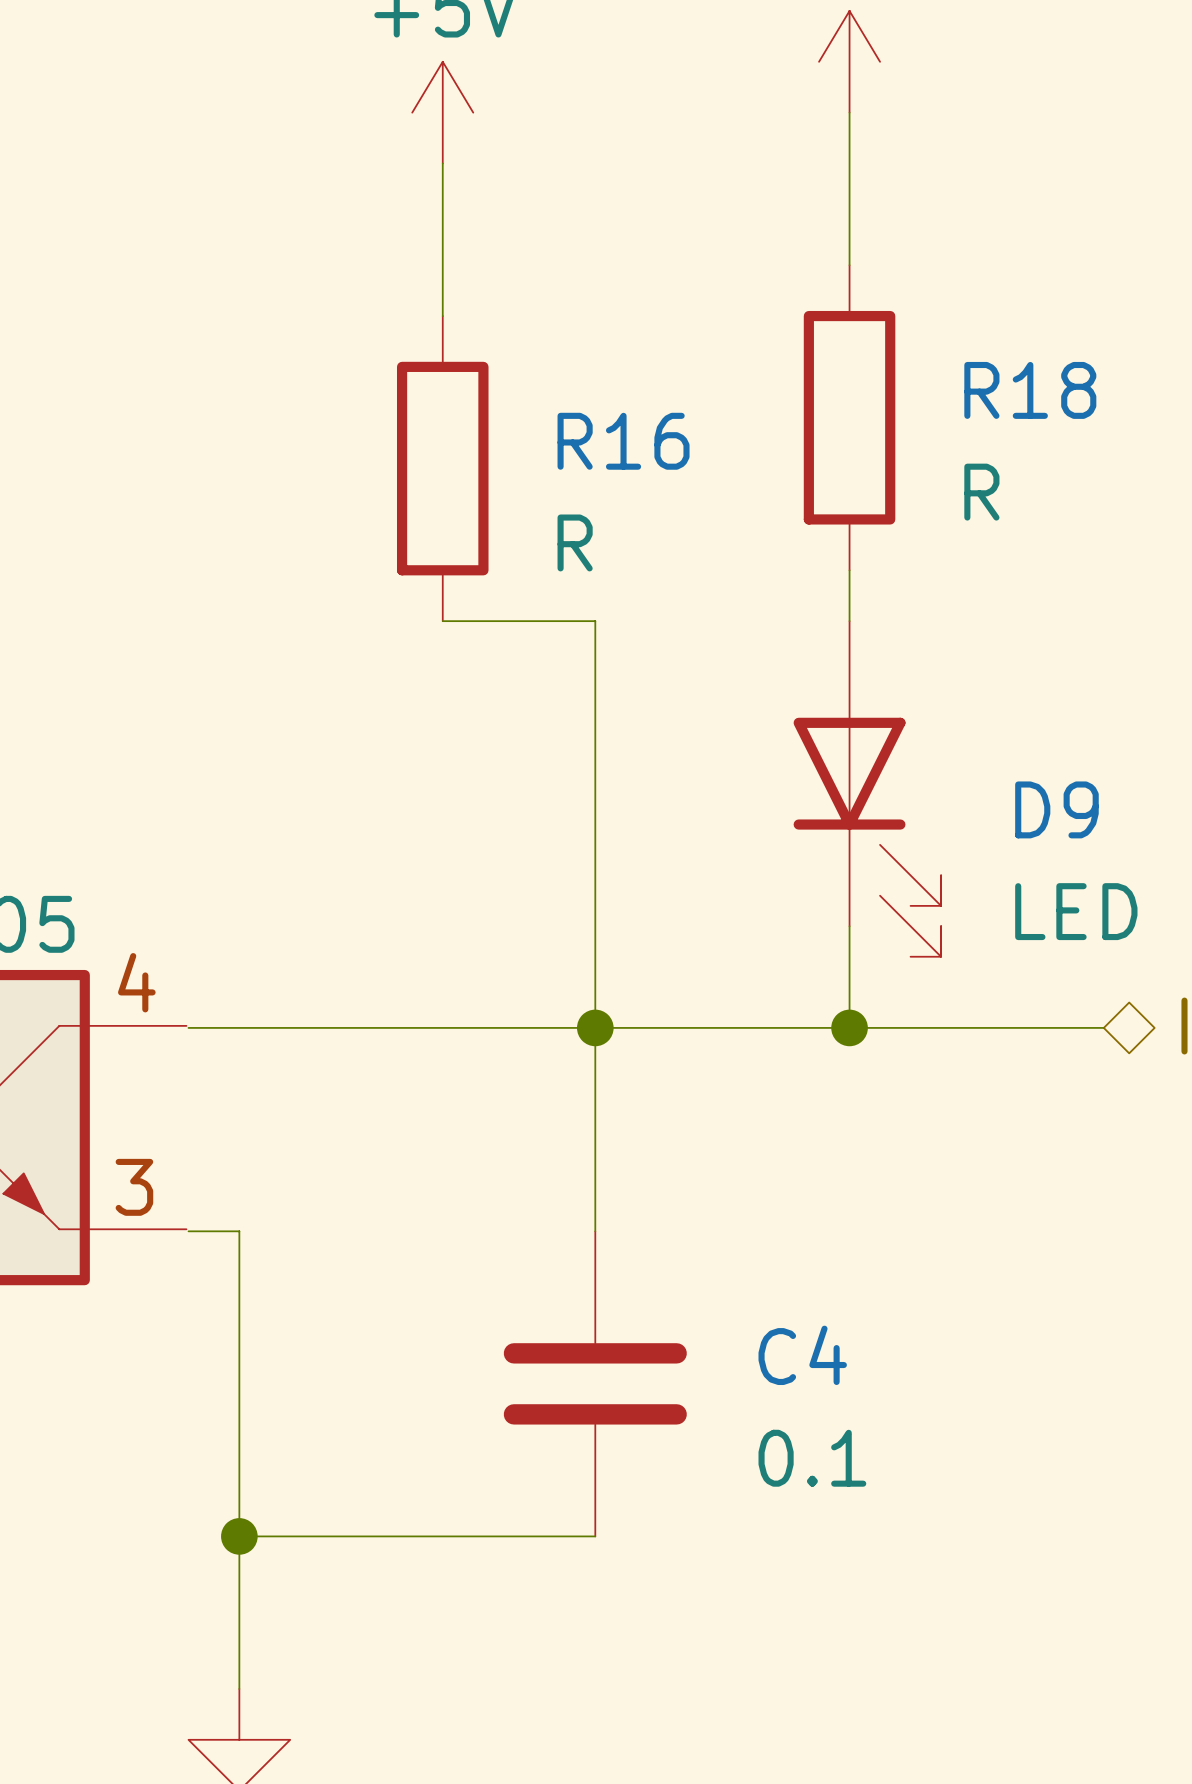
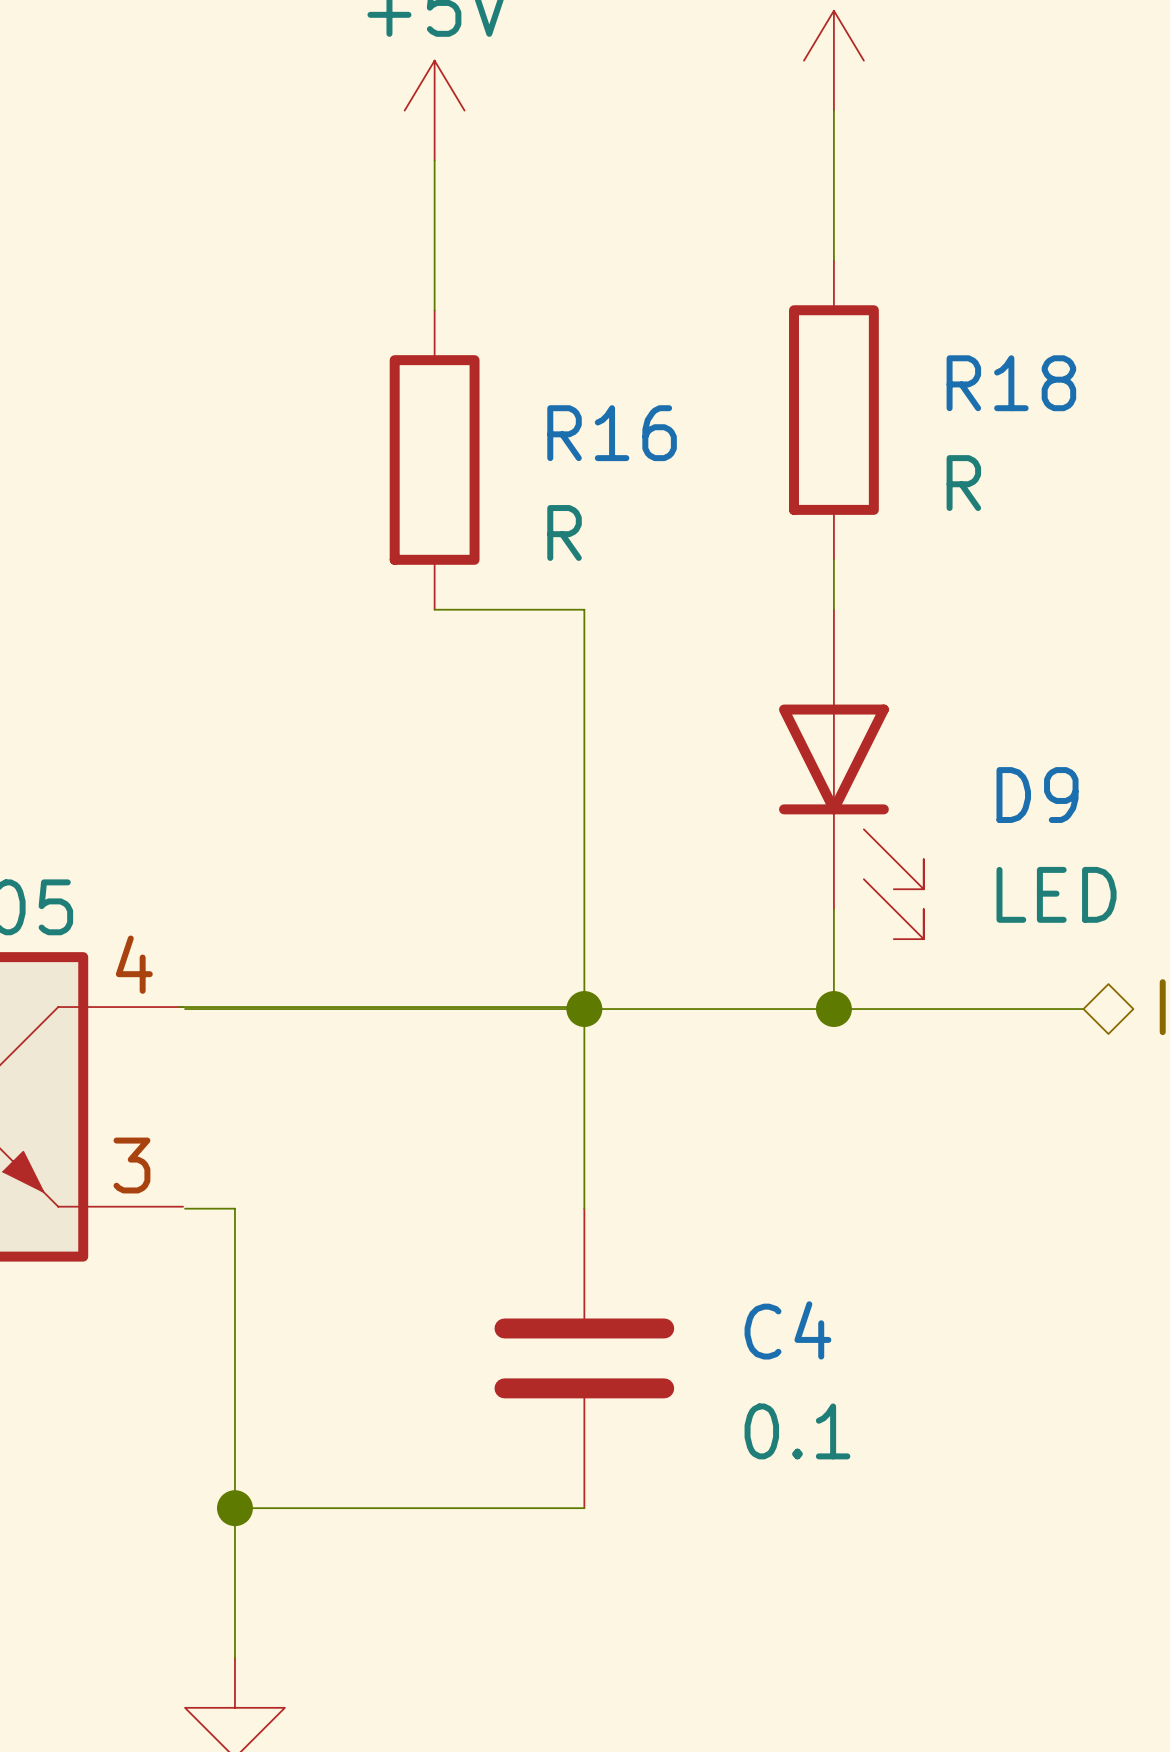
wire: none -> (179, 1007) (584, 1007)

